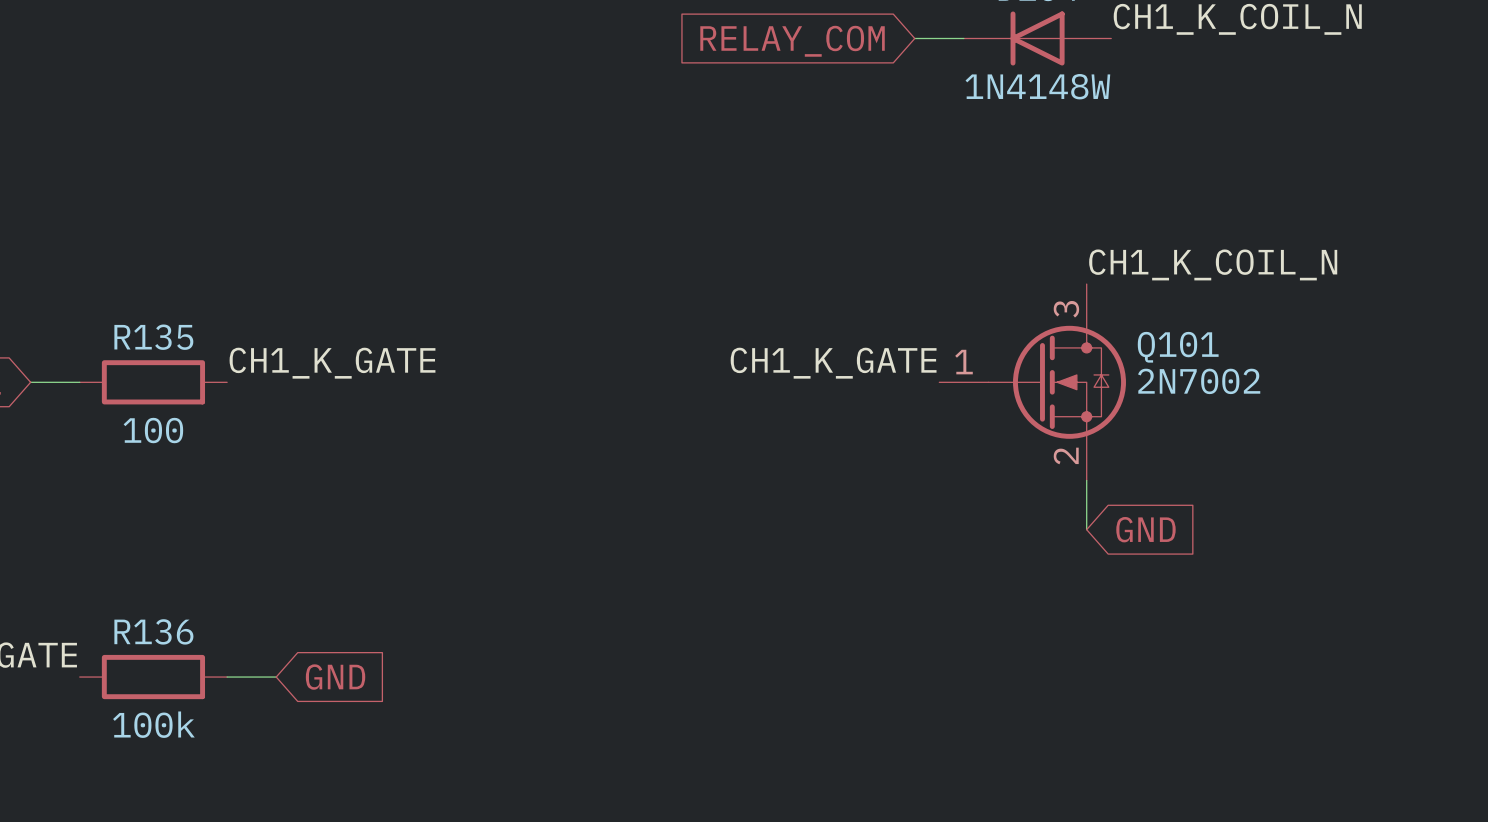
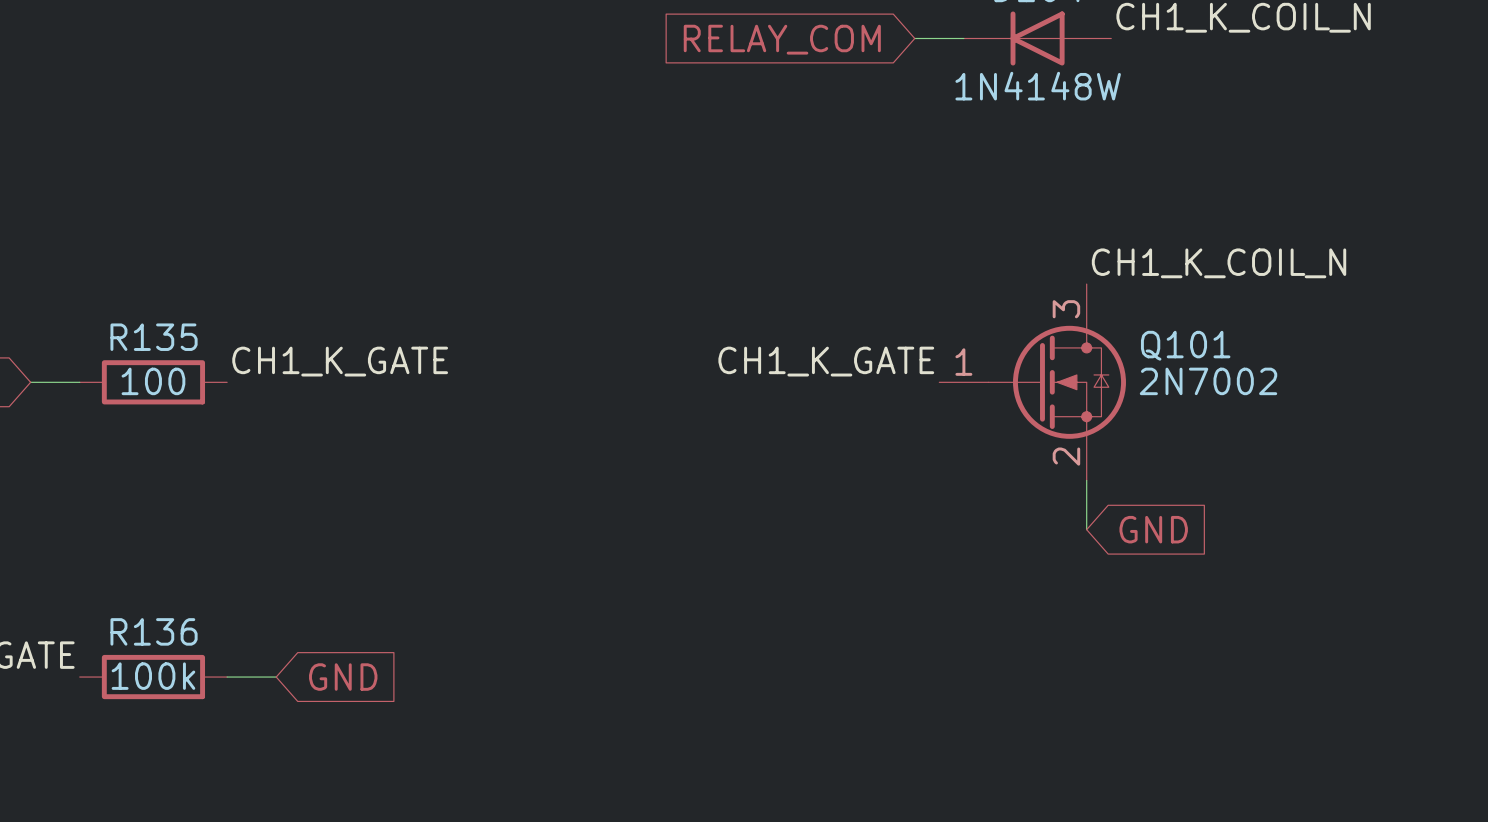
R135 value position: 100 (153, 430) -> 100 (153, 381)
R136 value position: 100k (153, 724) -> 100k (153, 676)

